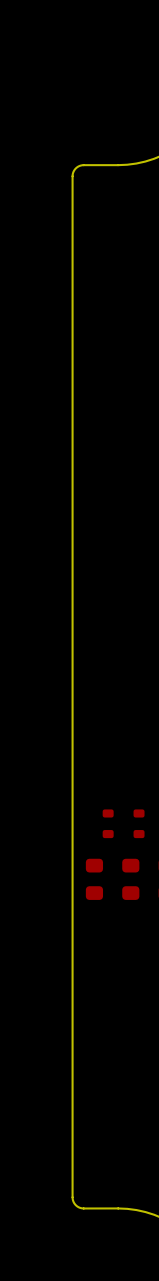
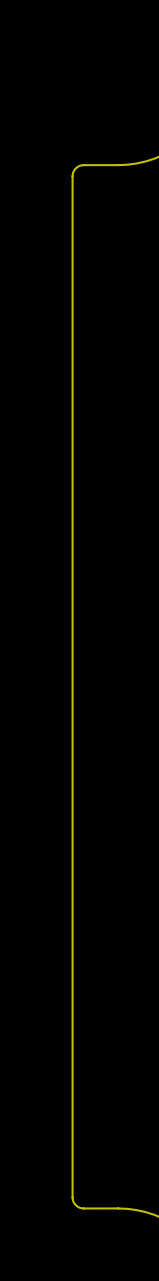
part: (108, 823) -> none
part: (139, 823) -> none
part: (94, 879) -> none
part: (130, 879) -> none

